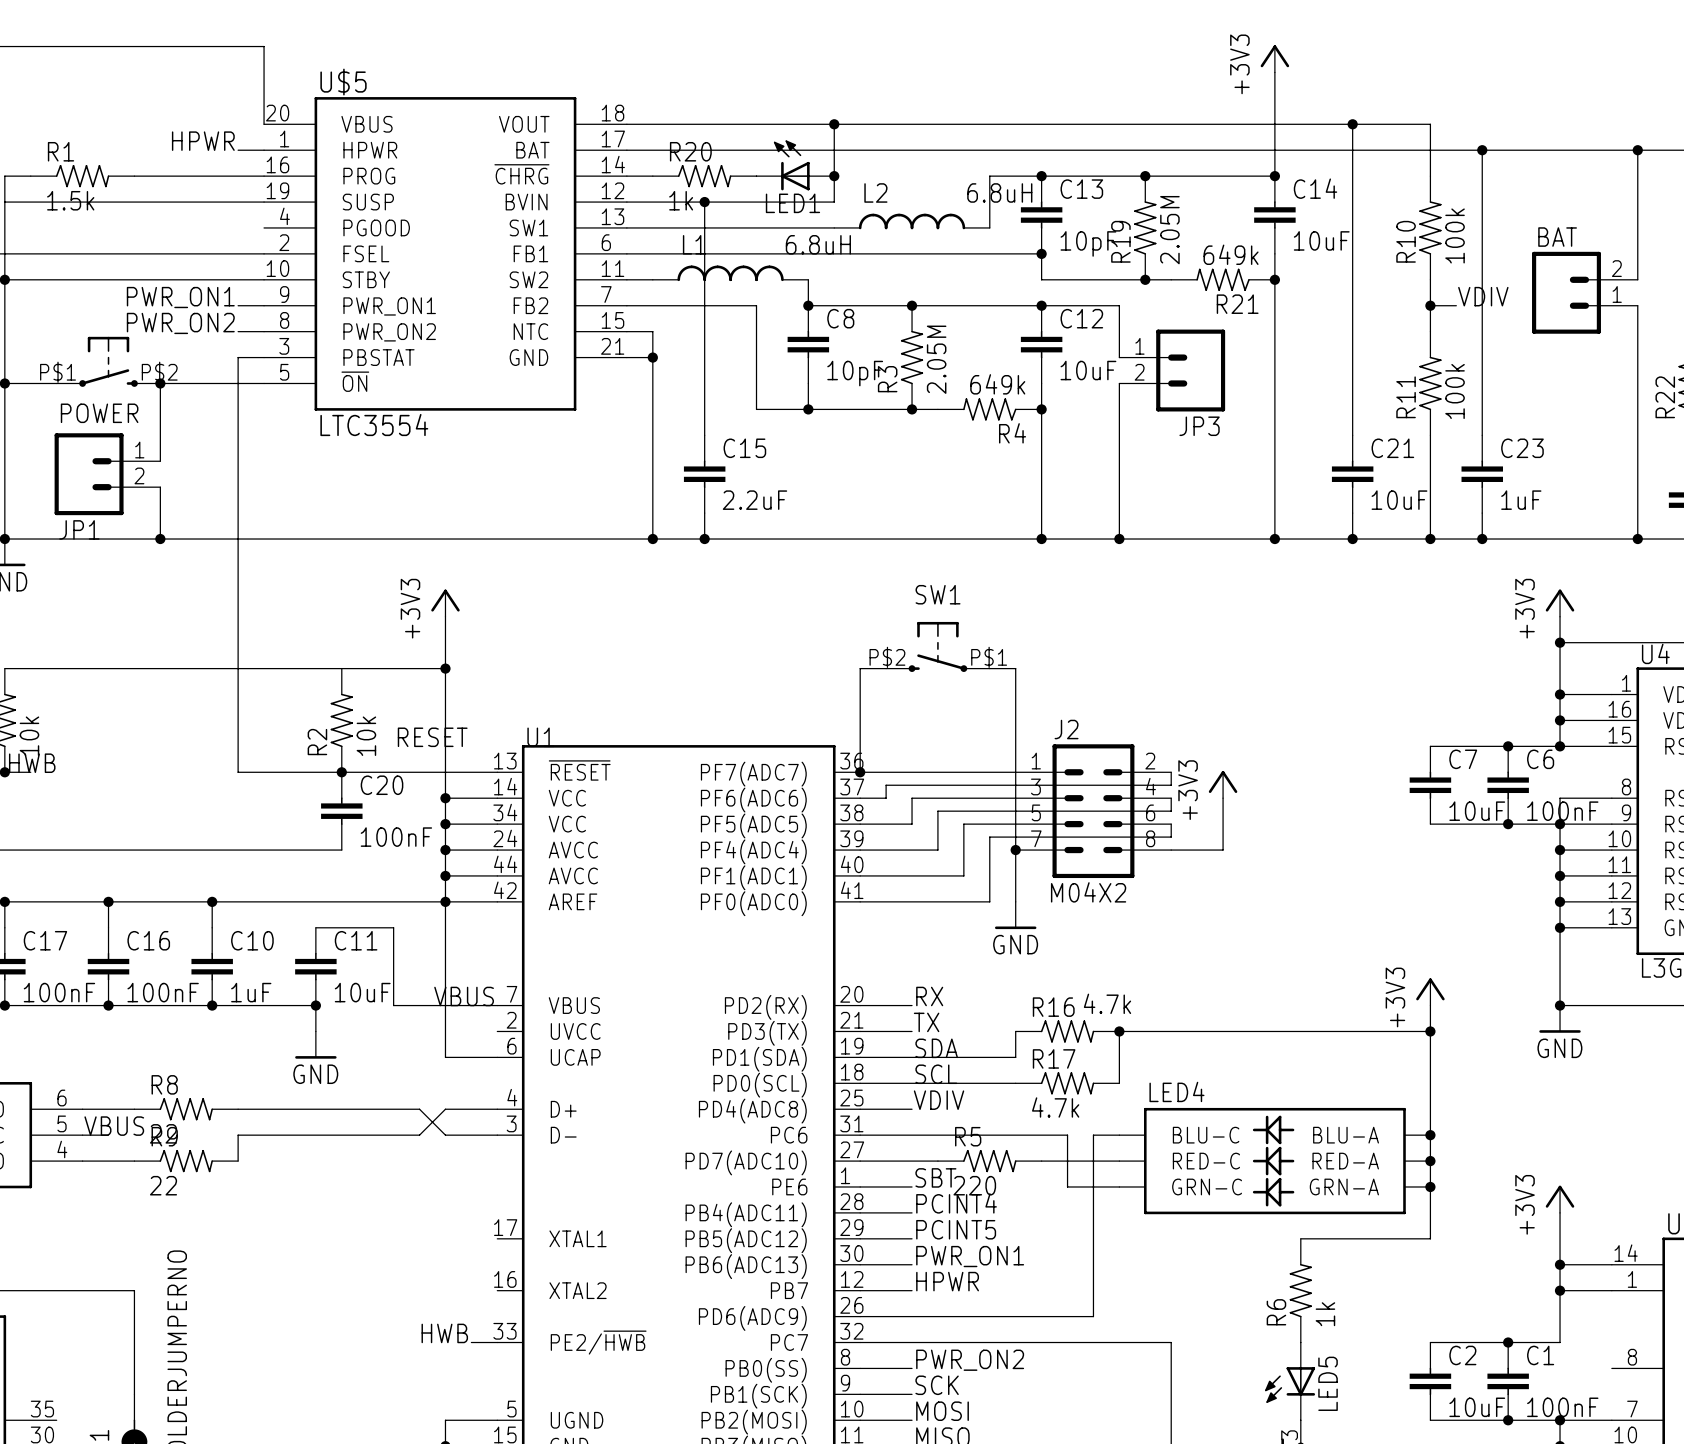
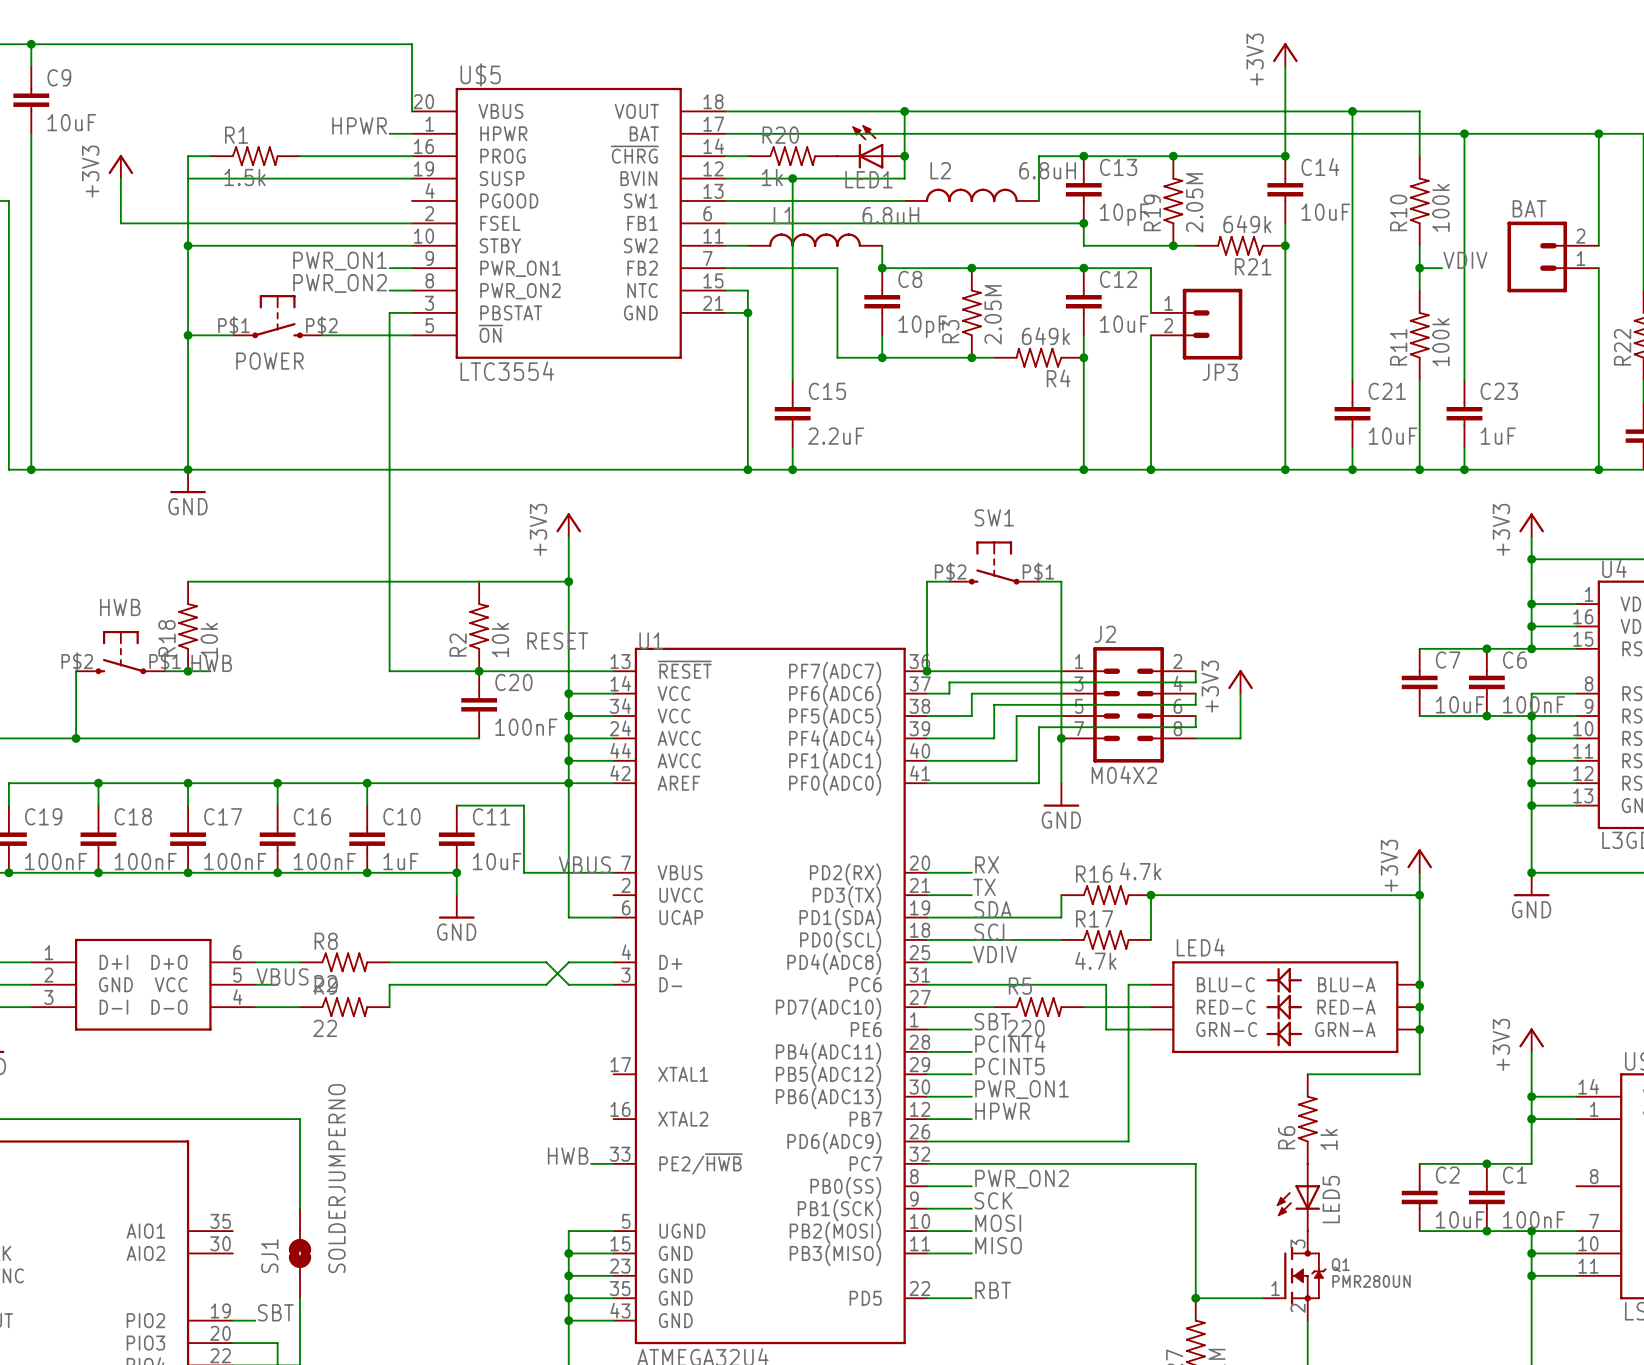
wire: (160, 383) (160, 461) -> none
junction: (160, 383) -> none
JP1: (107, 474) -> none
wire: (160, 487) (160, 539) -> none
junction: (160, 539) -> none

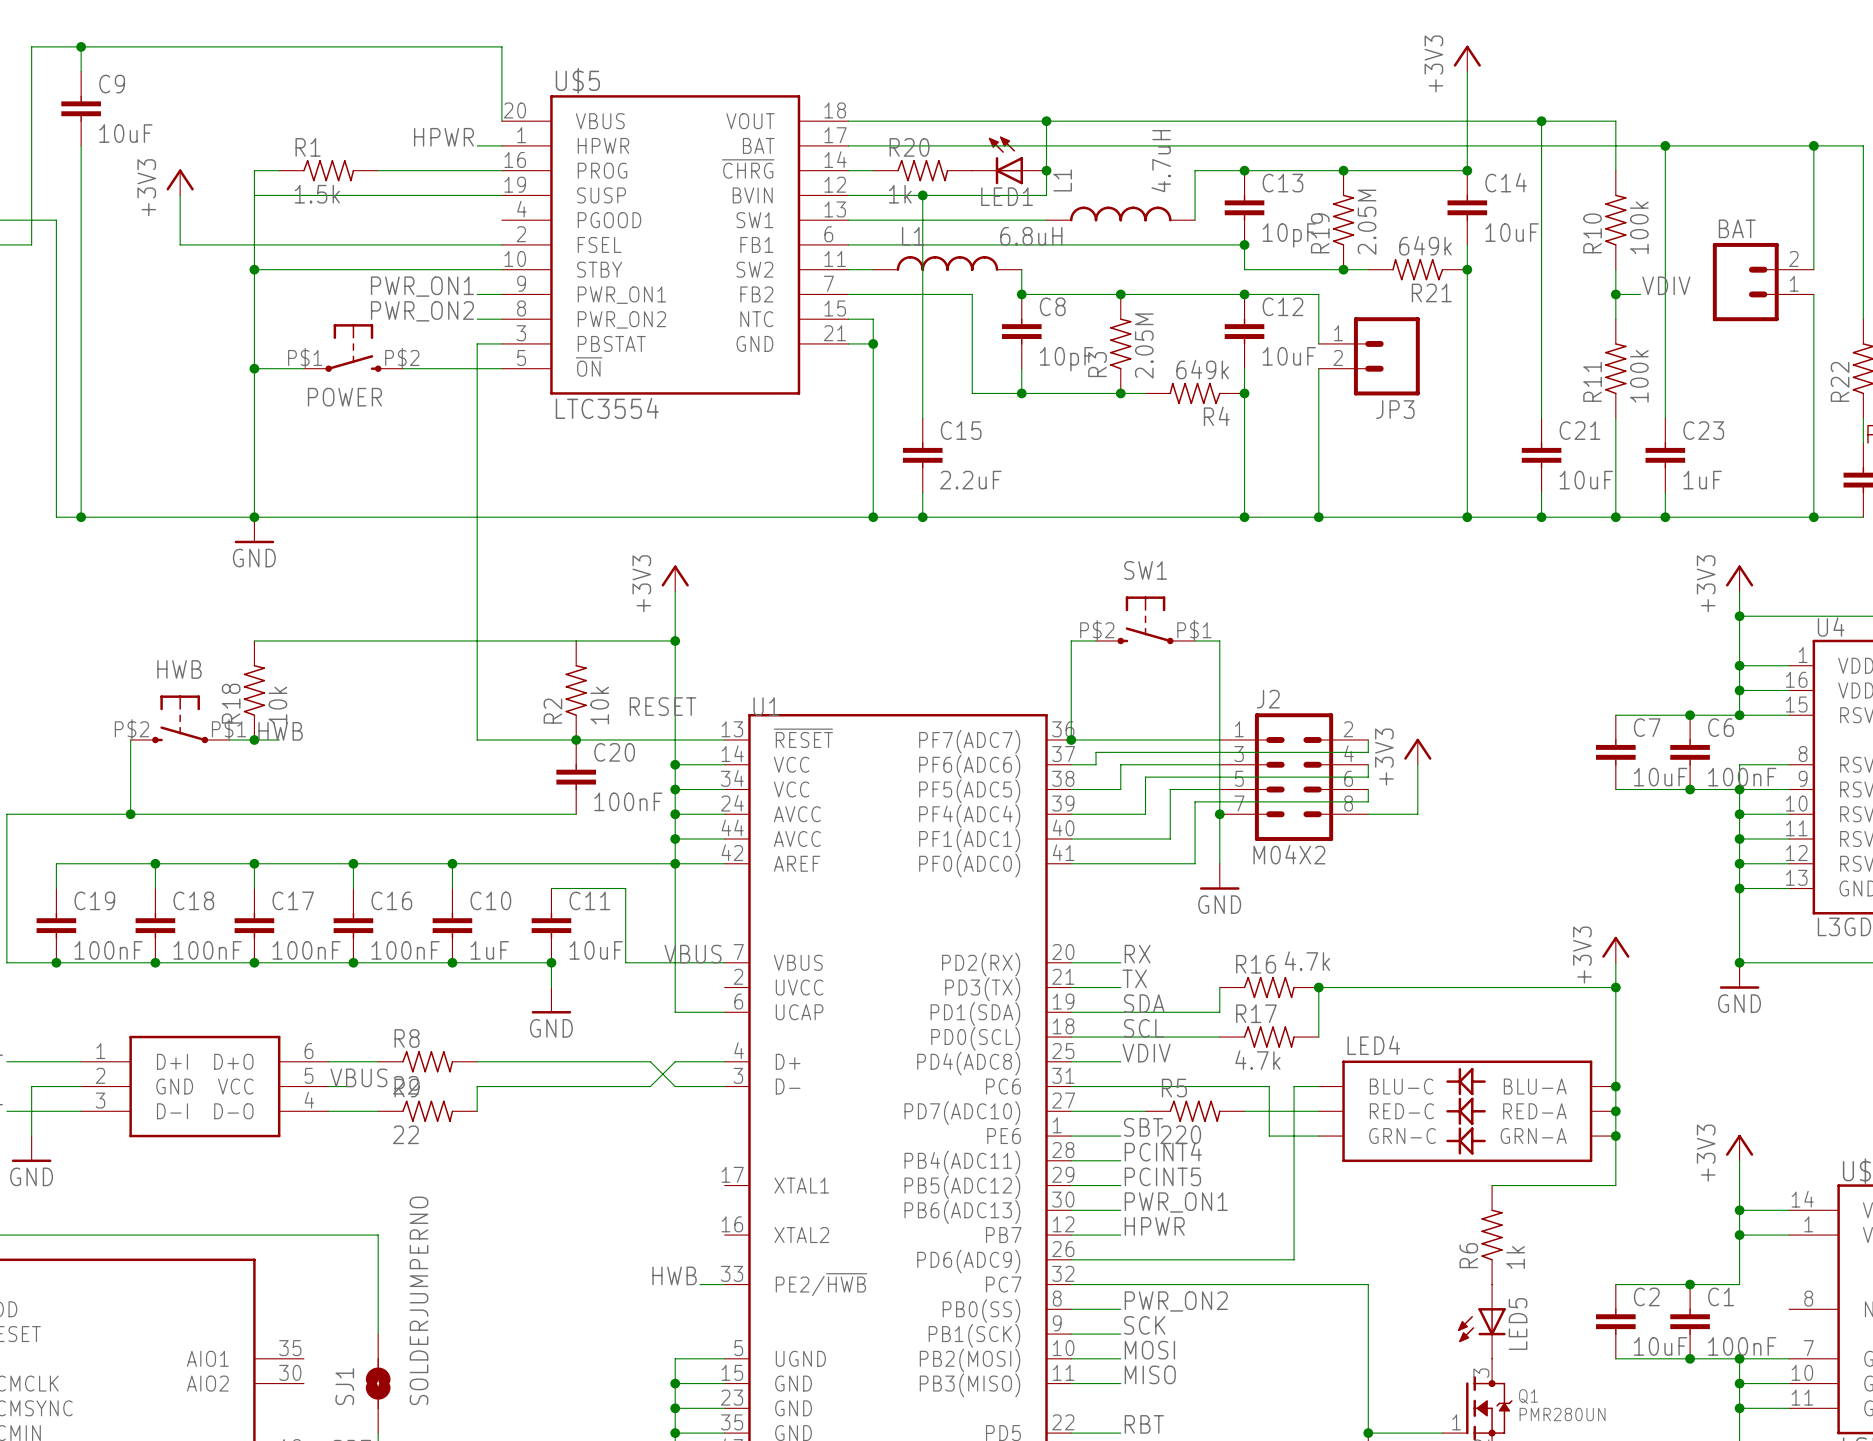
L2 name: L2 (940, 170) -> L1 (1062, 180)
L2 value: 6.8uH (1047, 170) -> 4.7uH (1161, 161)

